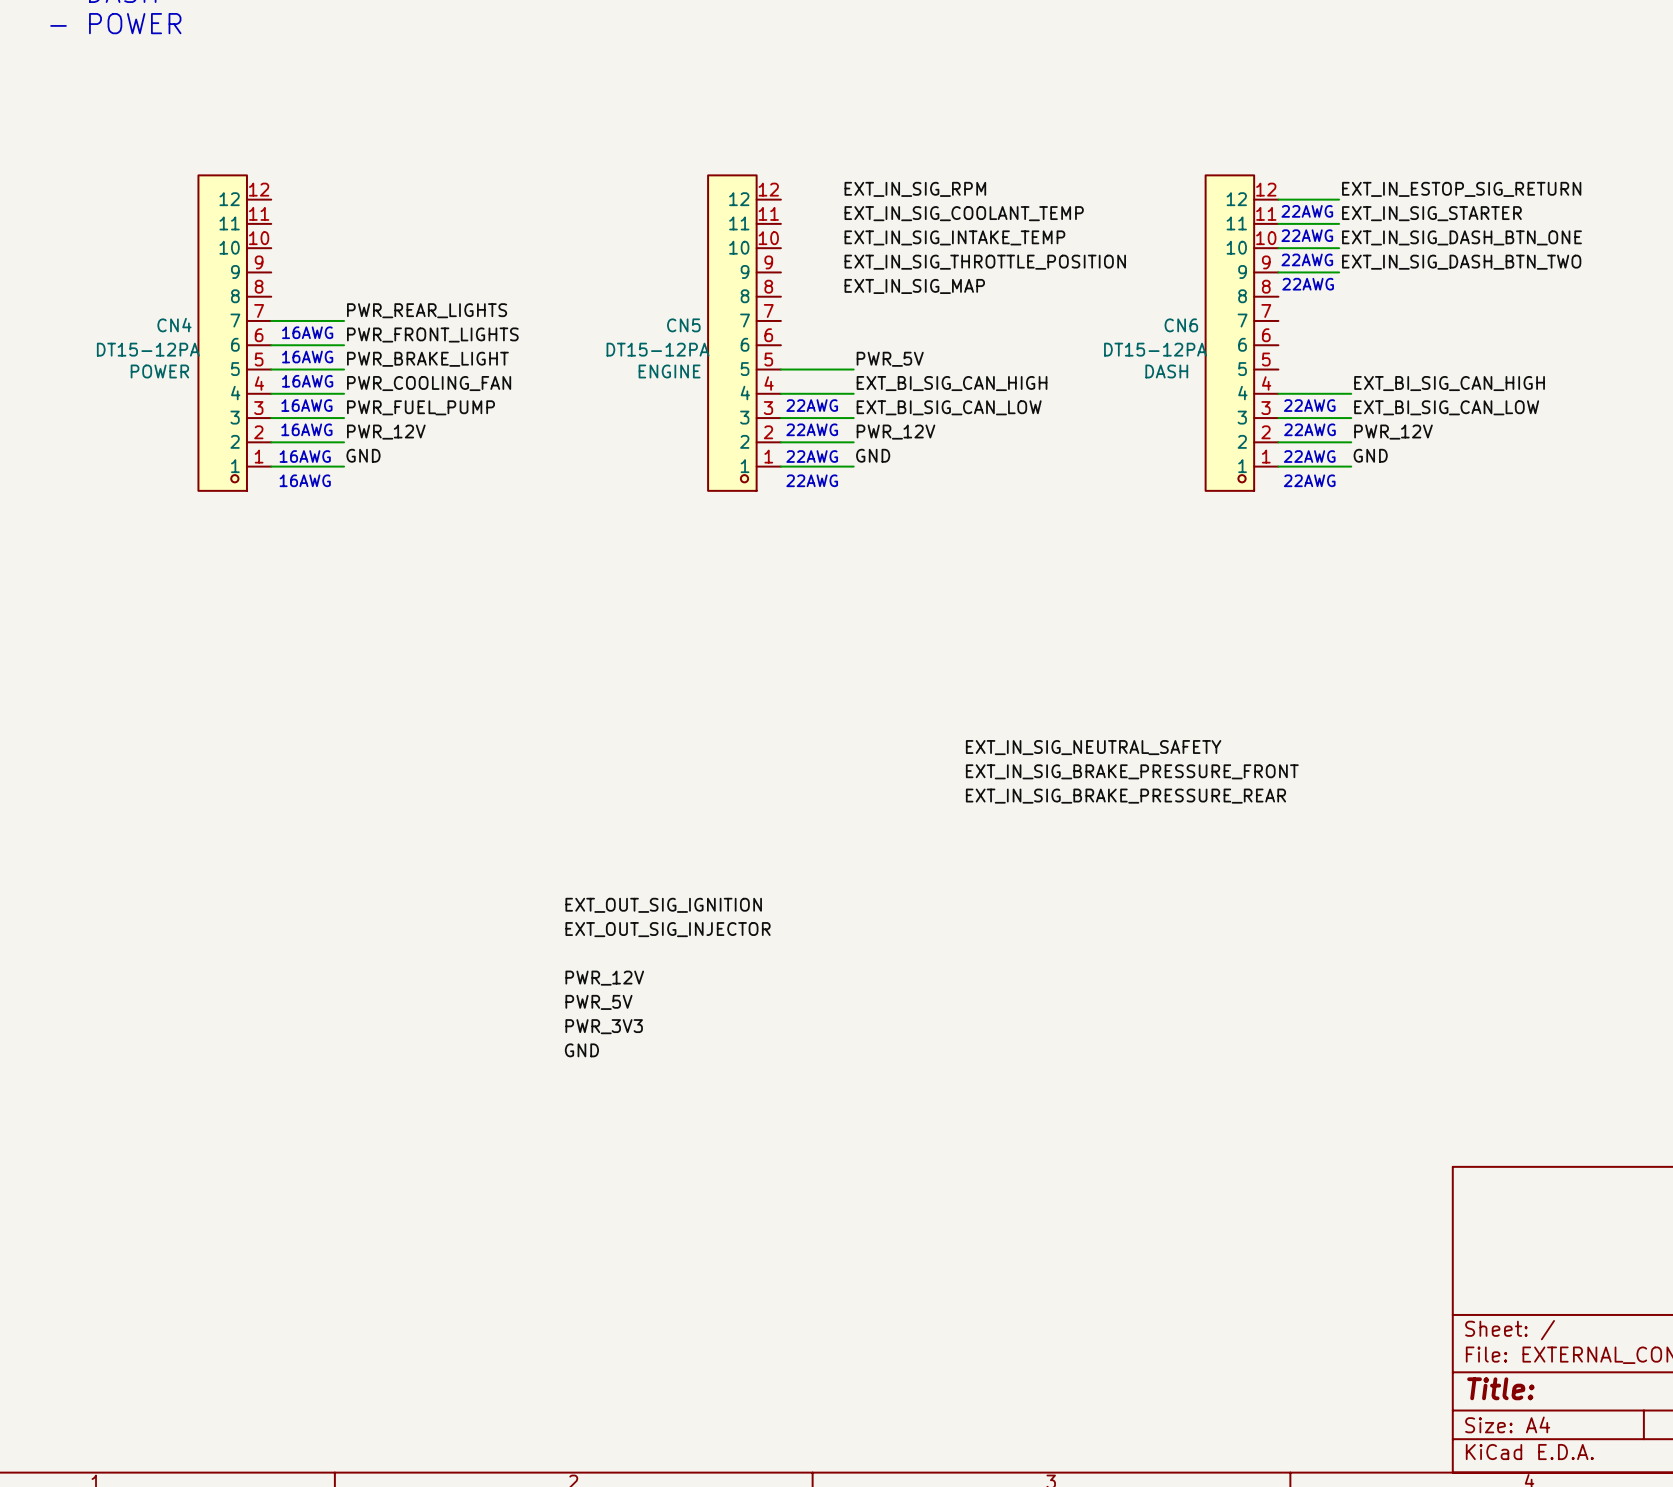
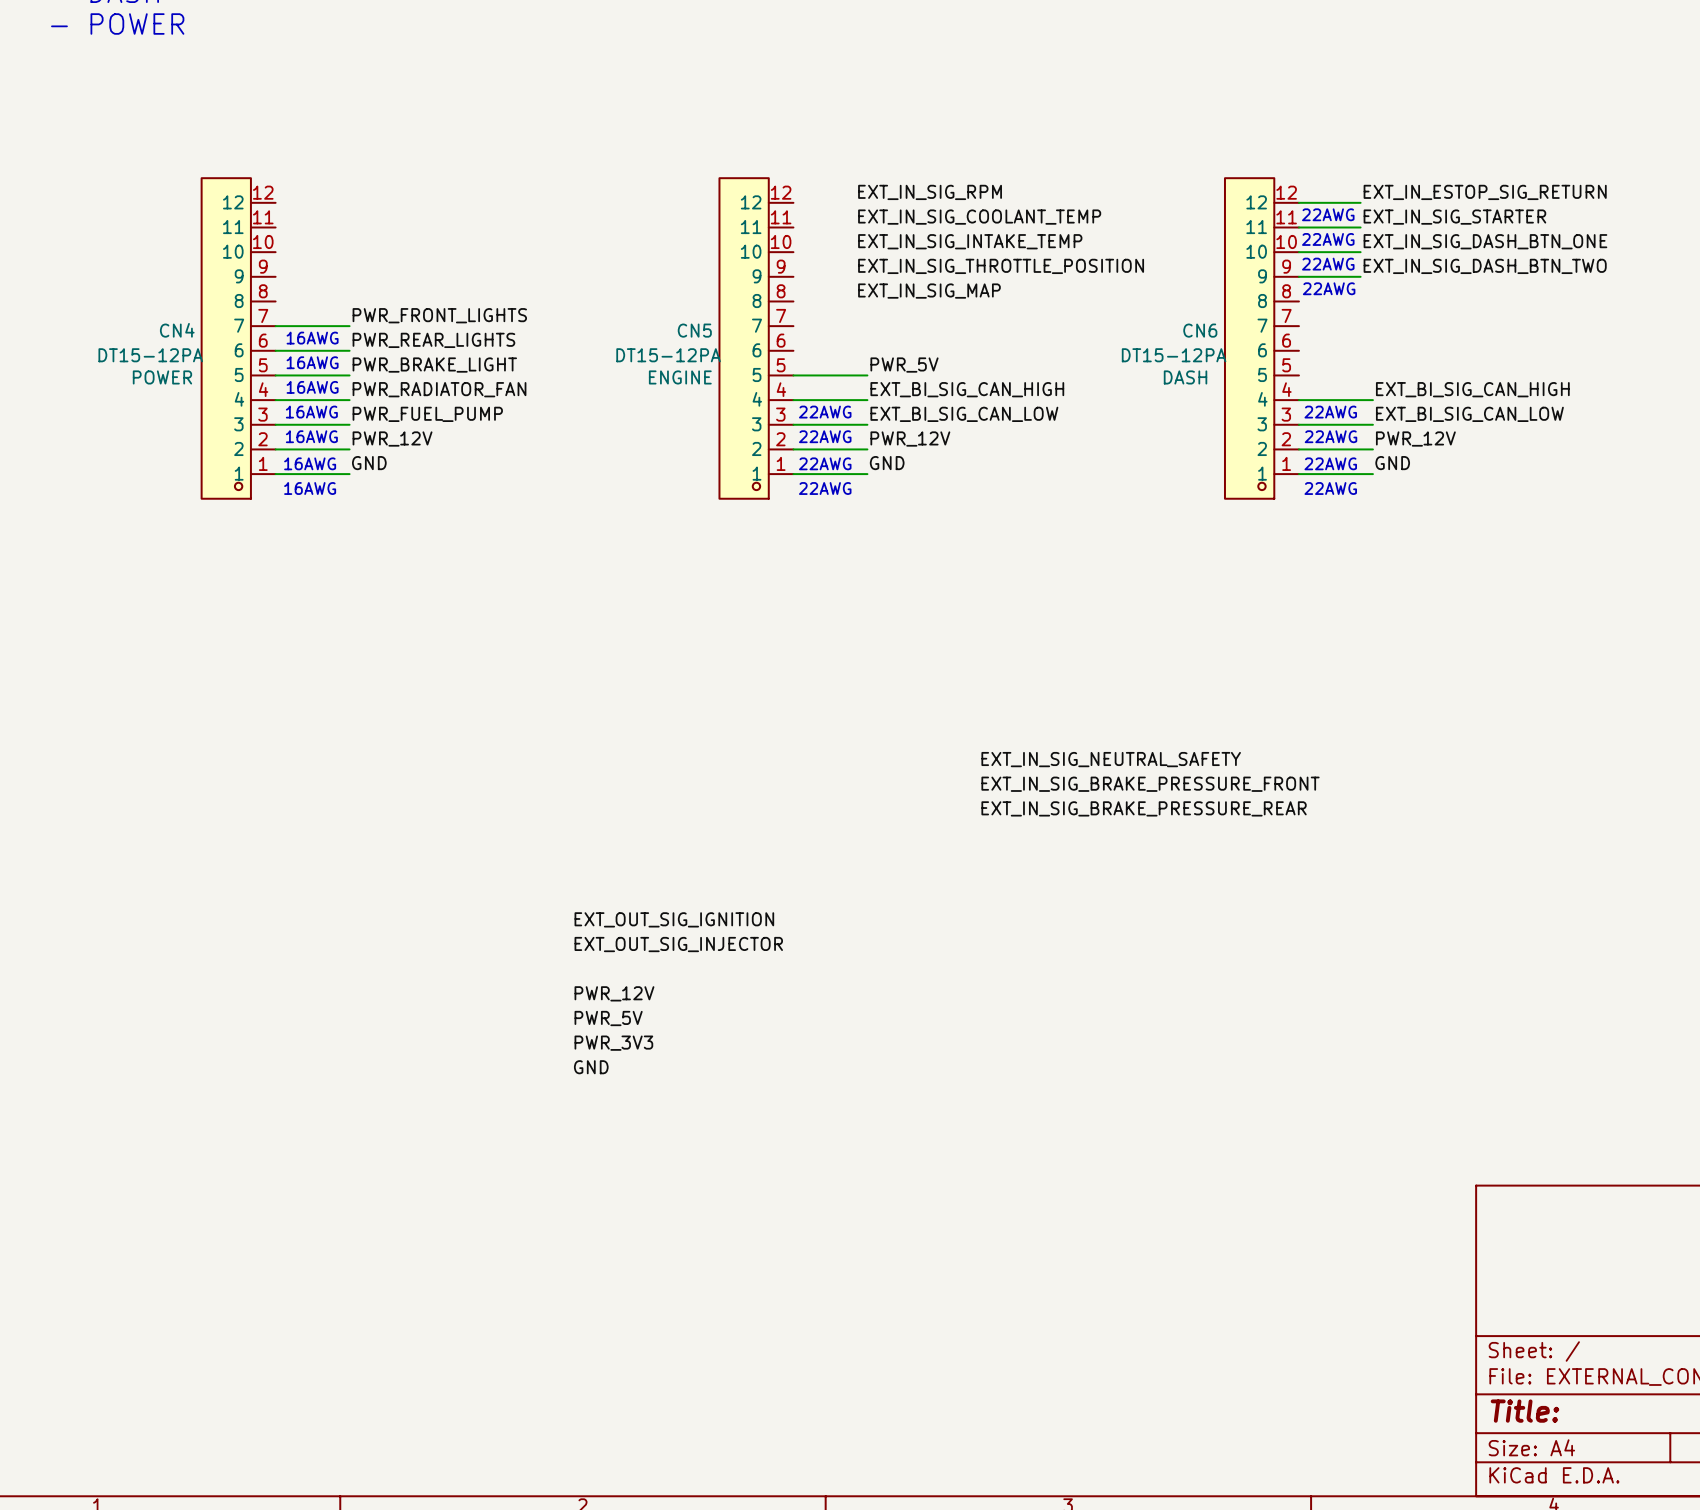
label: PWR_REAR_LIGHTS (427, 310) -> PWR_FRONT_LIGHTS (439, 315)
label: PWR_FRONT_LIGHTS (432, 334) -> PWR_REAR_LIGHTS (433, 340)
label: PWR_COOLING_FAN (429, 383) -> PWR_RADIATOR_FAN (439, 389)

